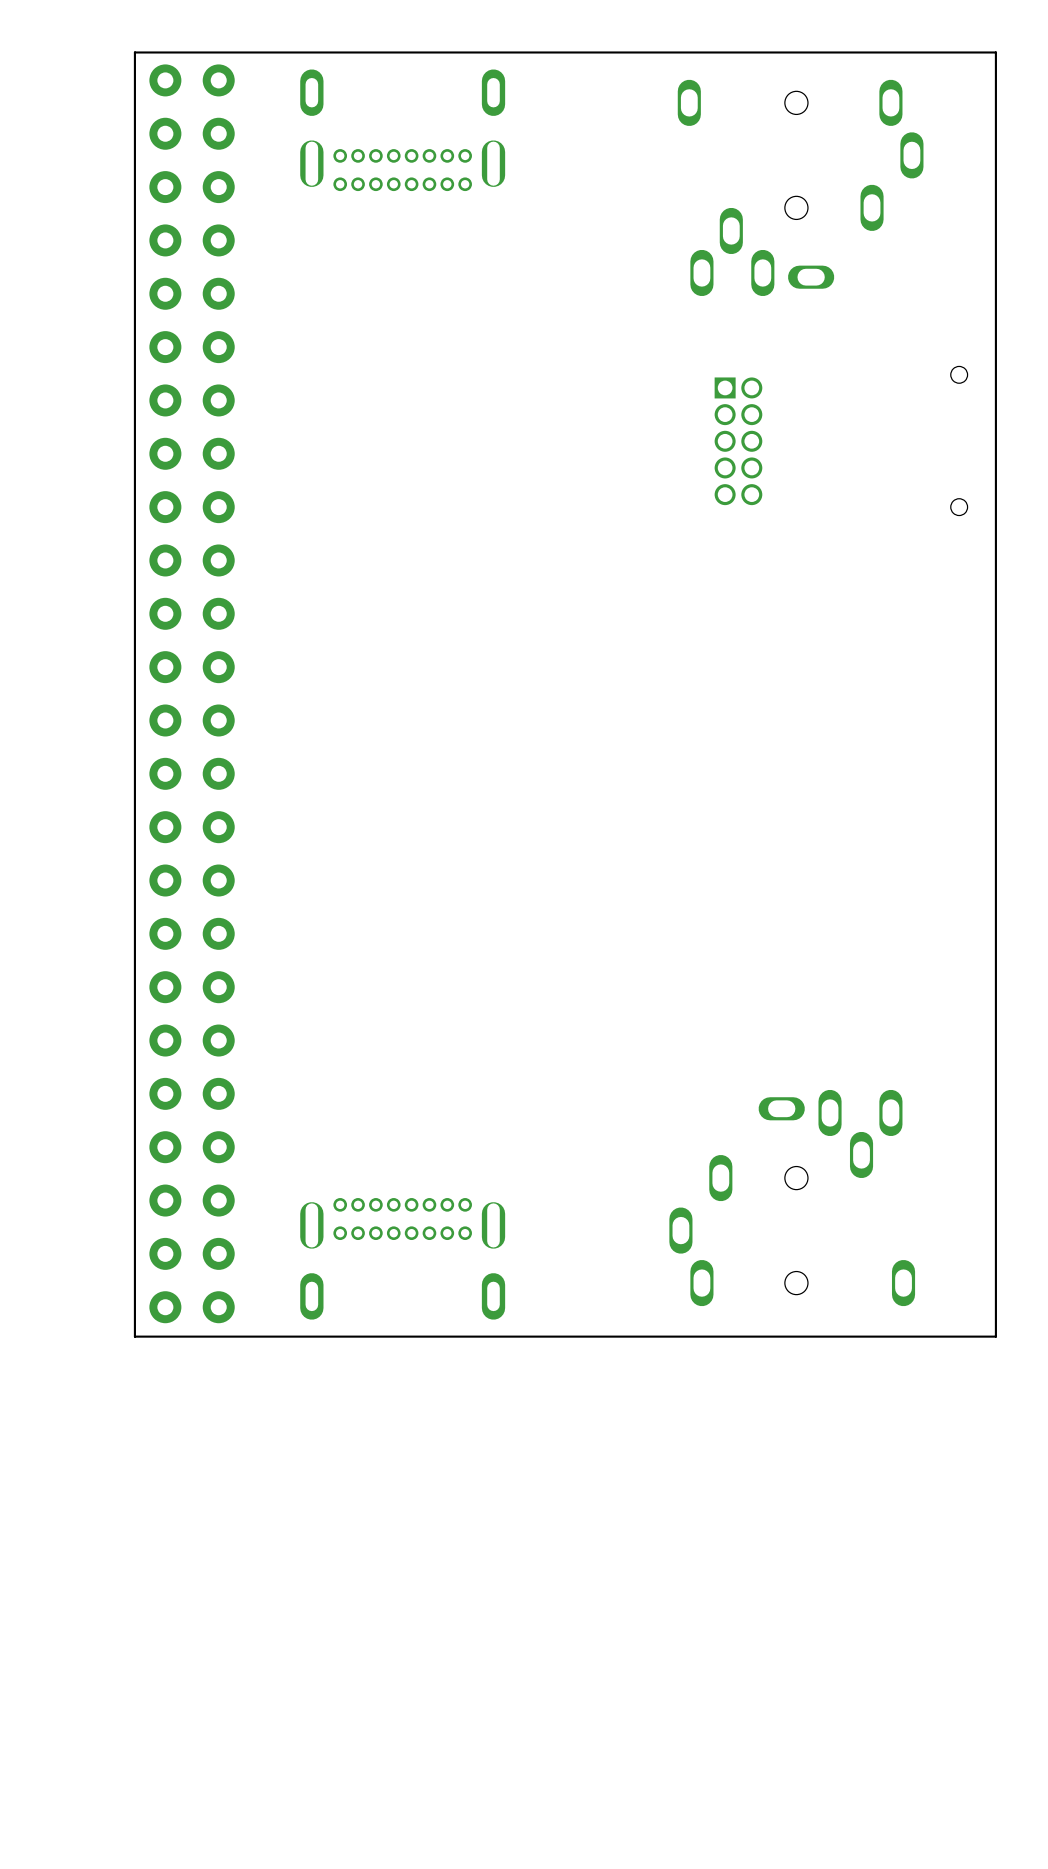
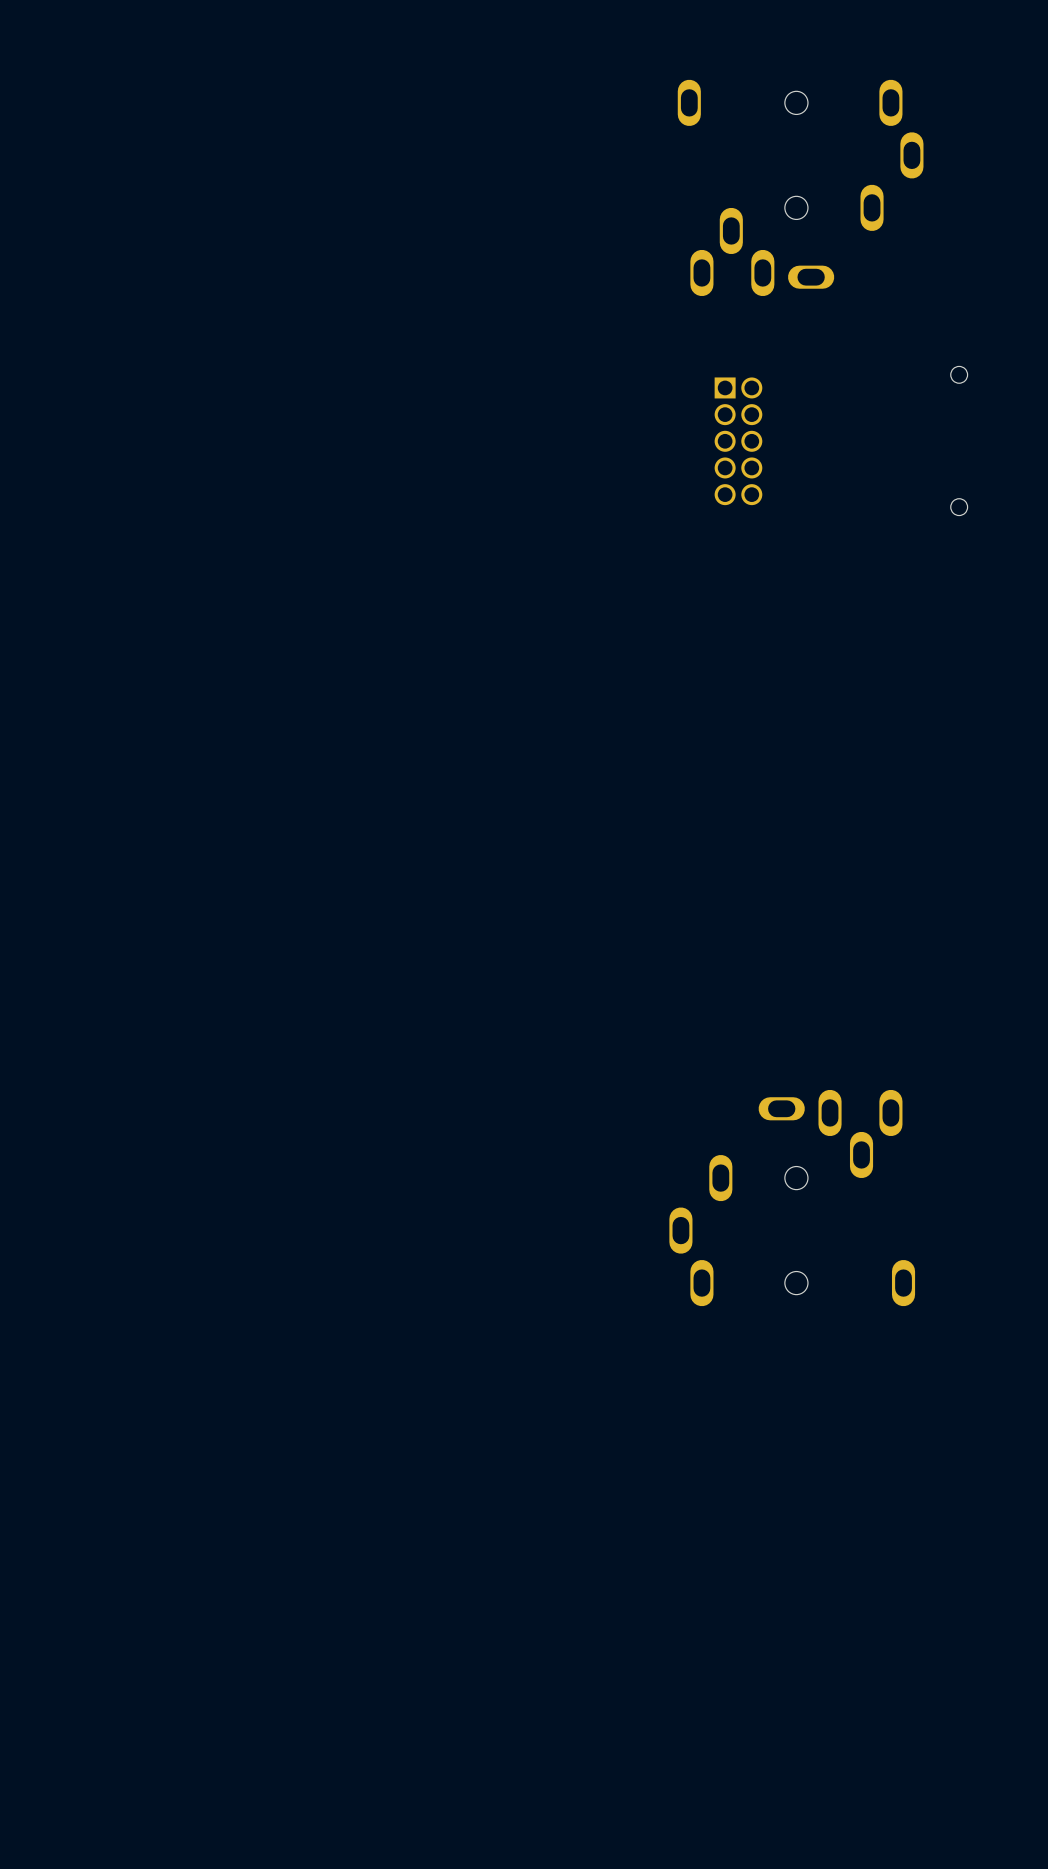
board edge: (995, 52) (134, 52) (134, 1336) (995, 1336) (995, 52) -> none
part: (402, 130) -> none
part: (192, 693) -> none
part: (402, 1258) -> none

